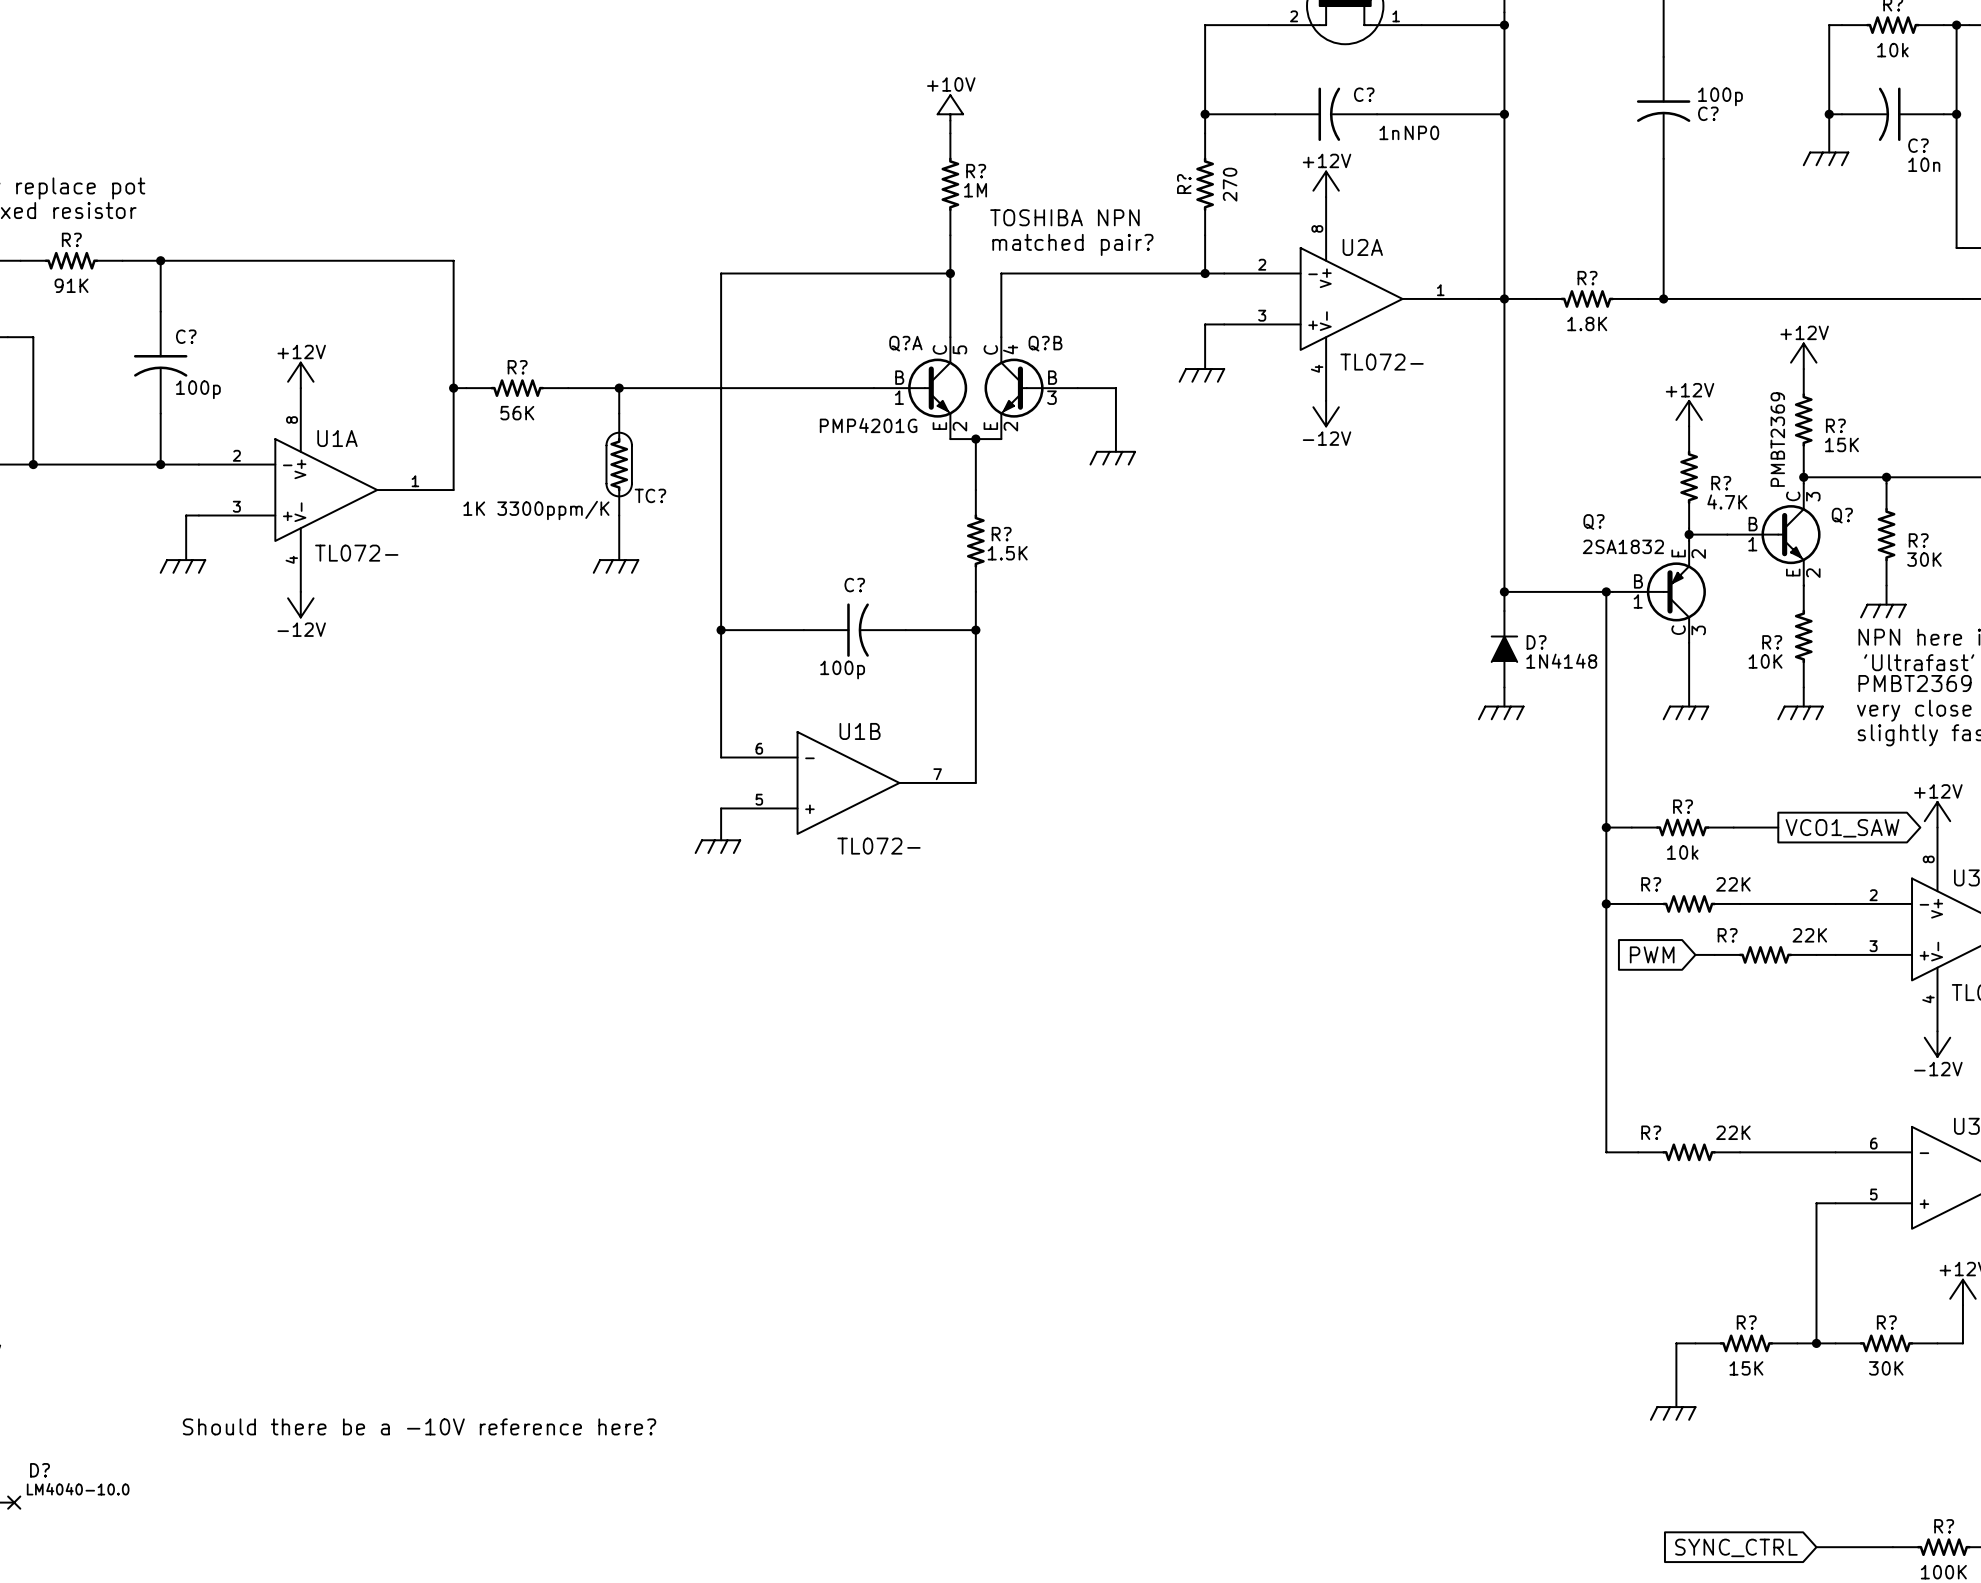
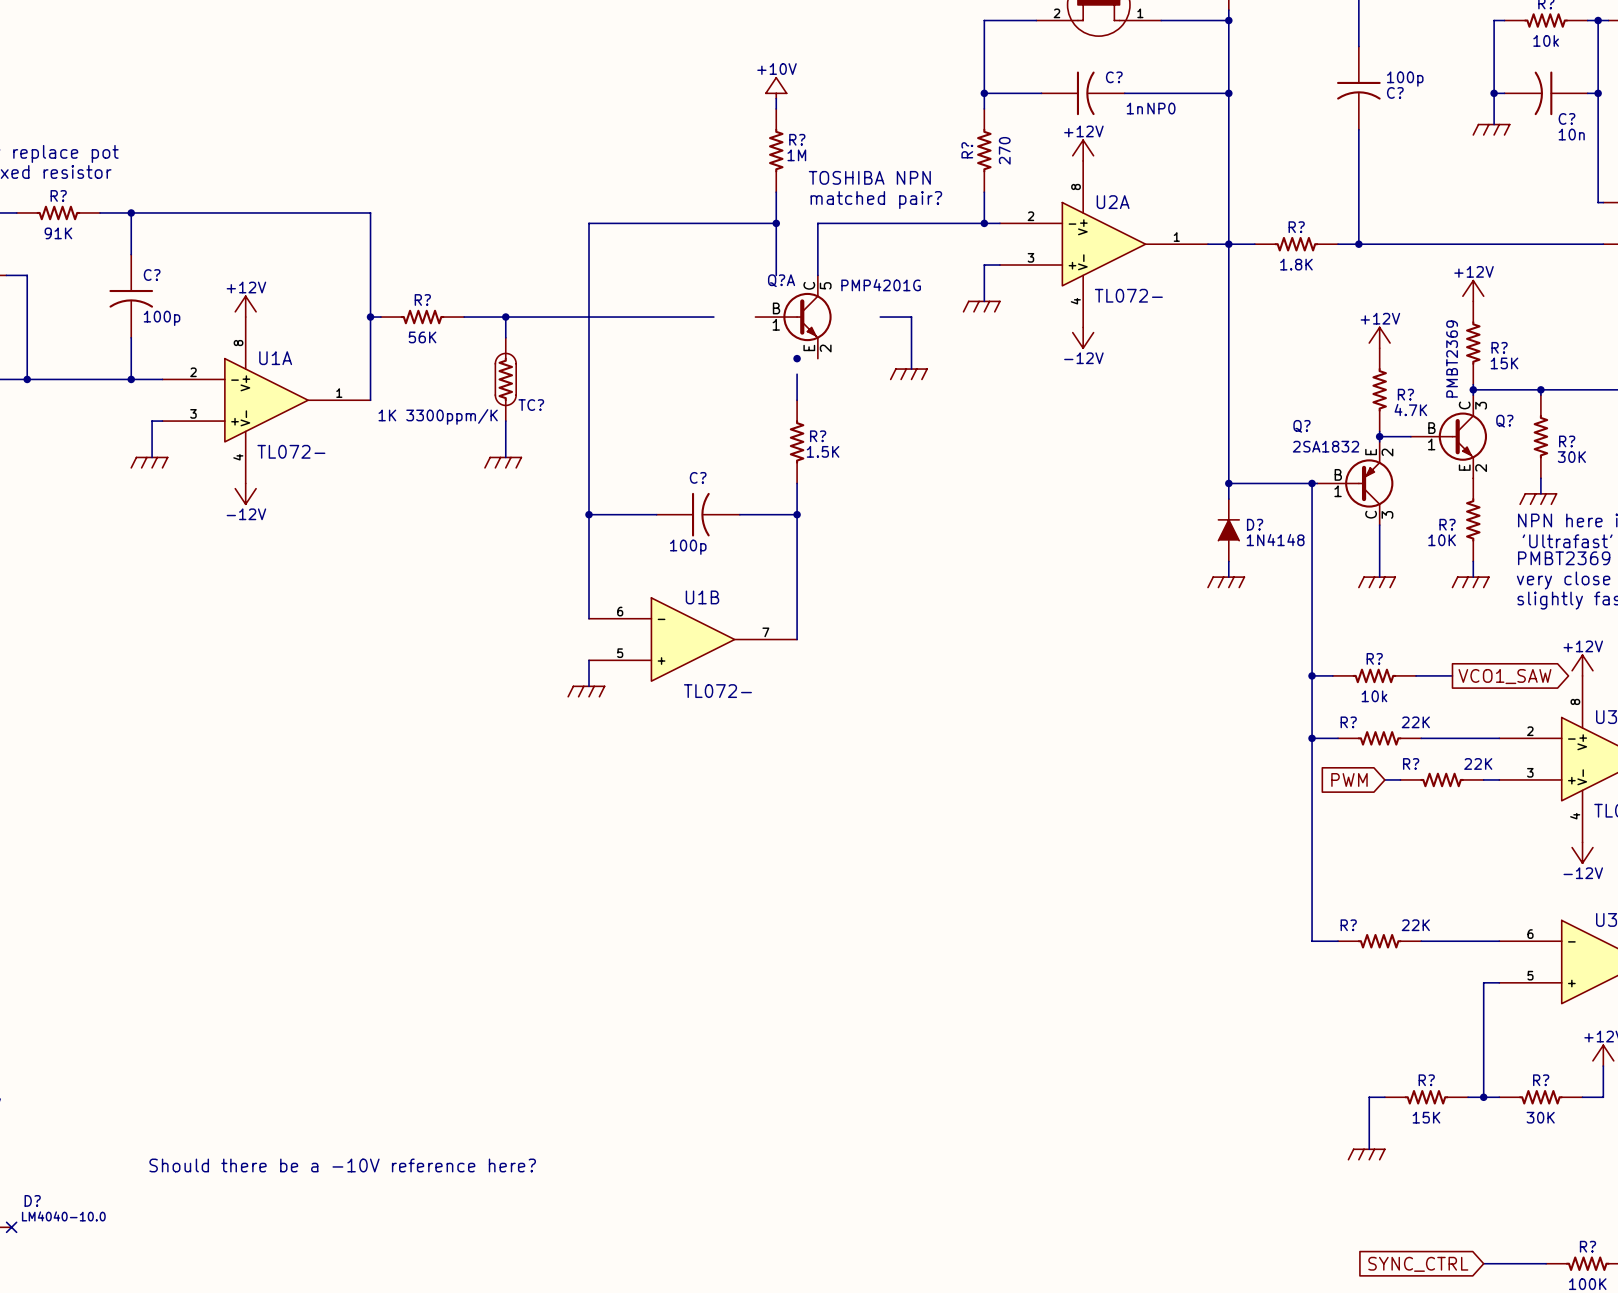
Q?A position: (920, 388) -> (793, 317)
Q?B: (1031, 388) -> none
Q?A value position: PMP4201G (868, 425) -> PMP4201G (881, 285)
wire: (950, 439) (1001, 439) -> none
wire: (975, 439) (975, 458) -> none

